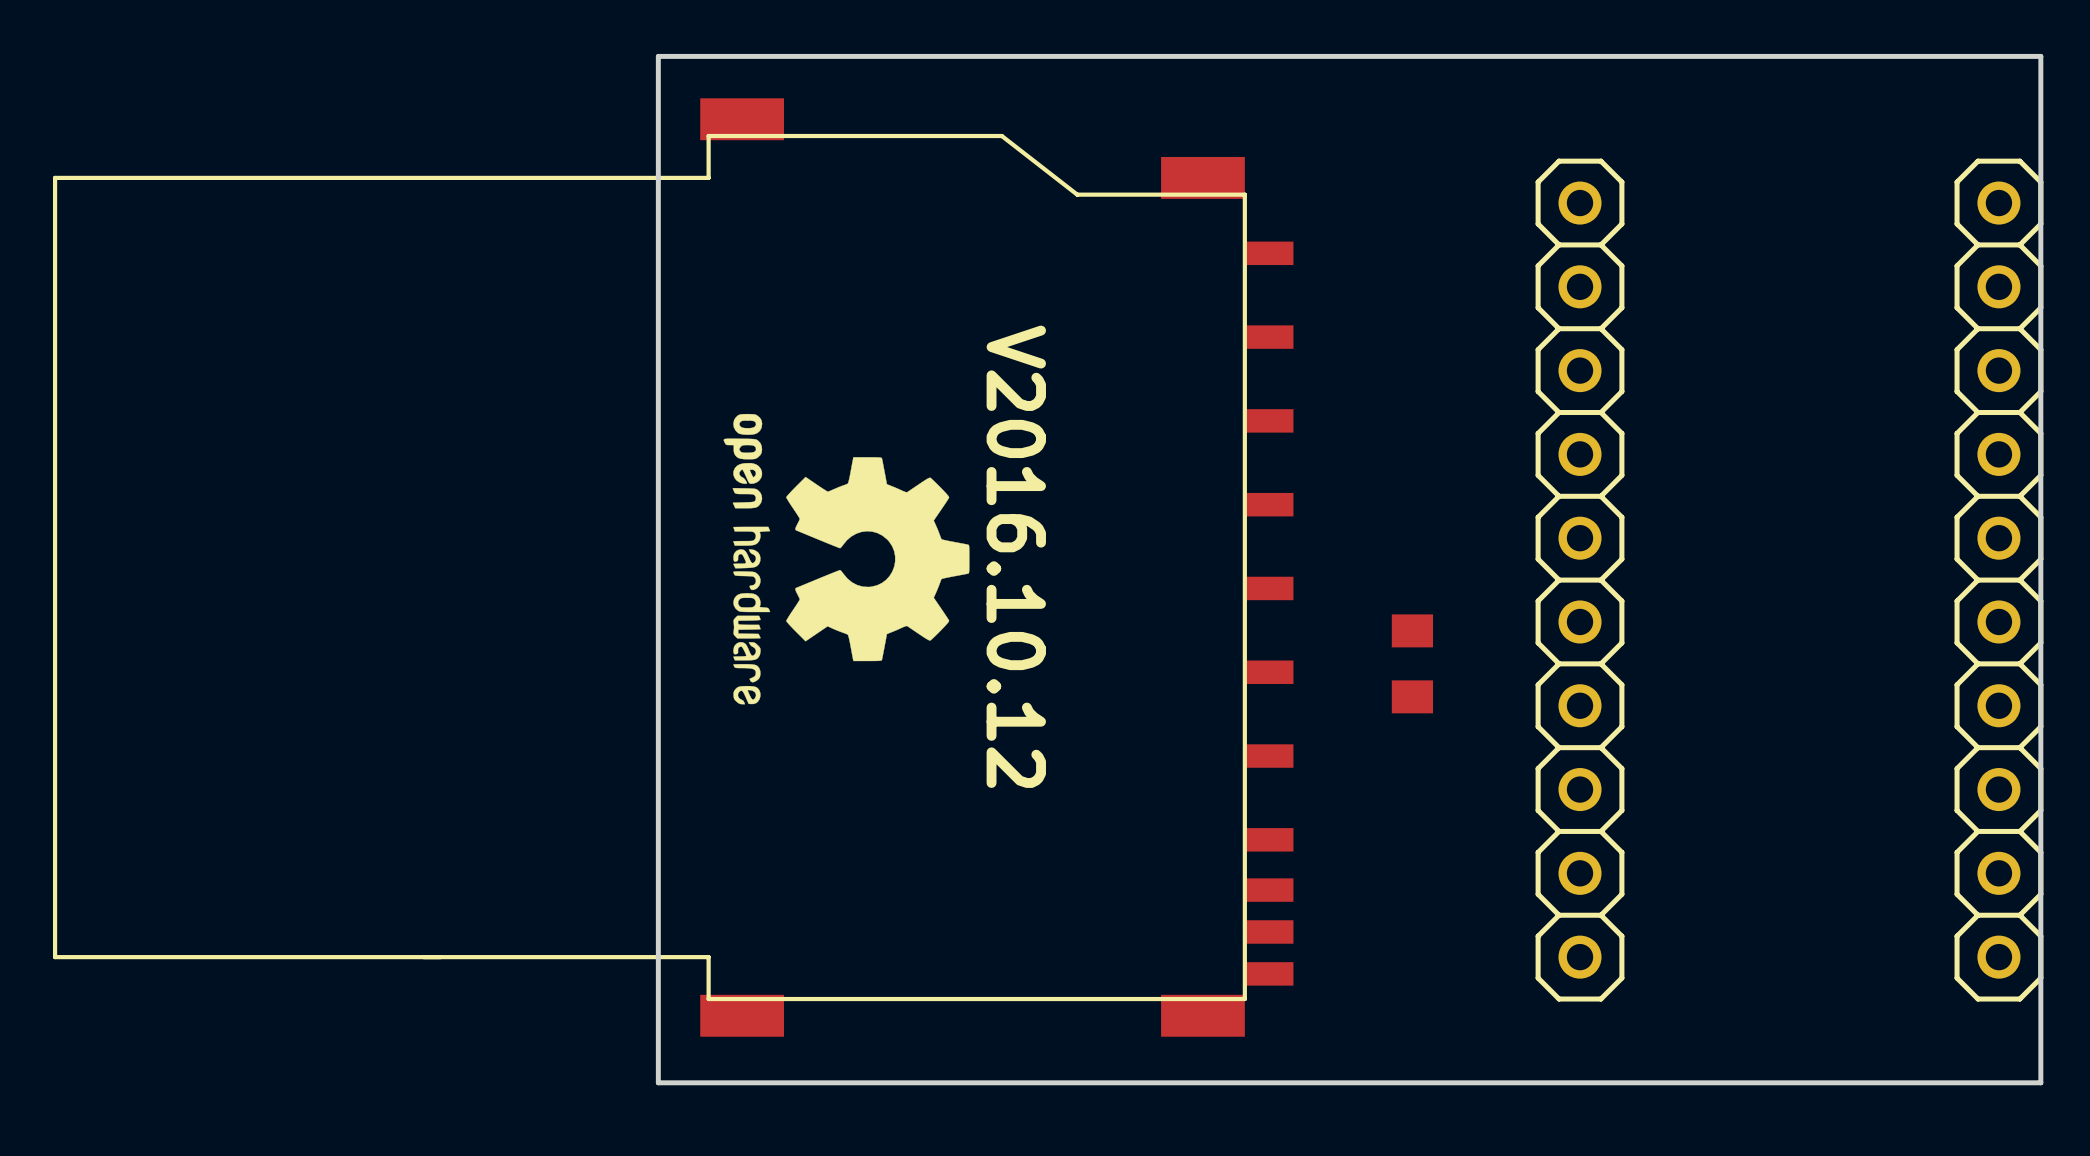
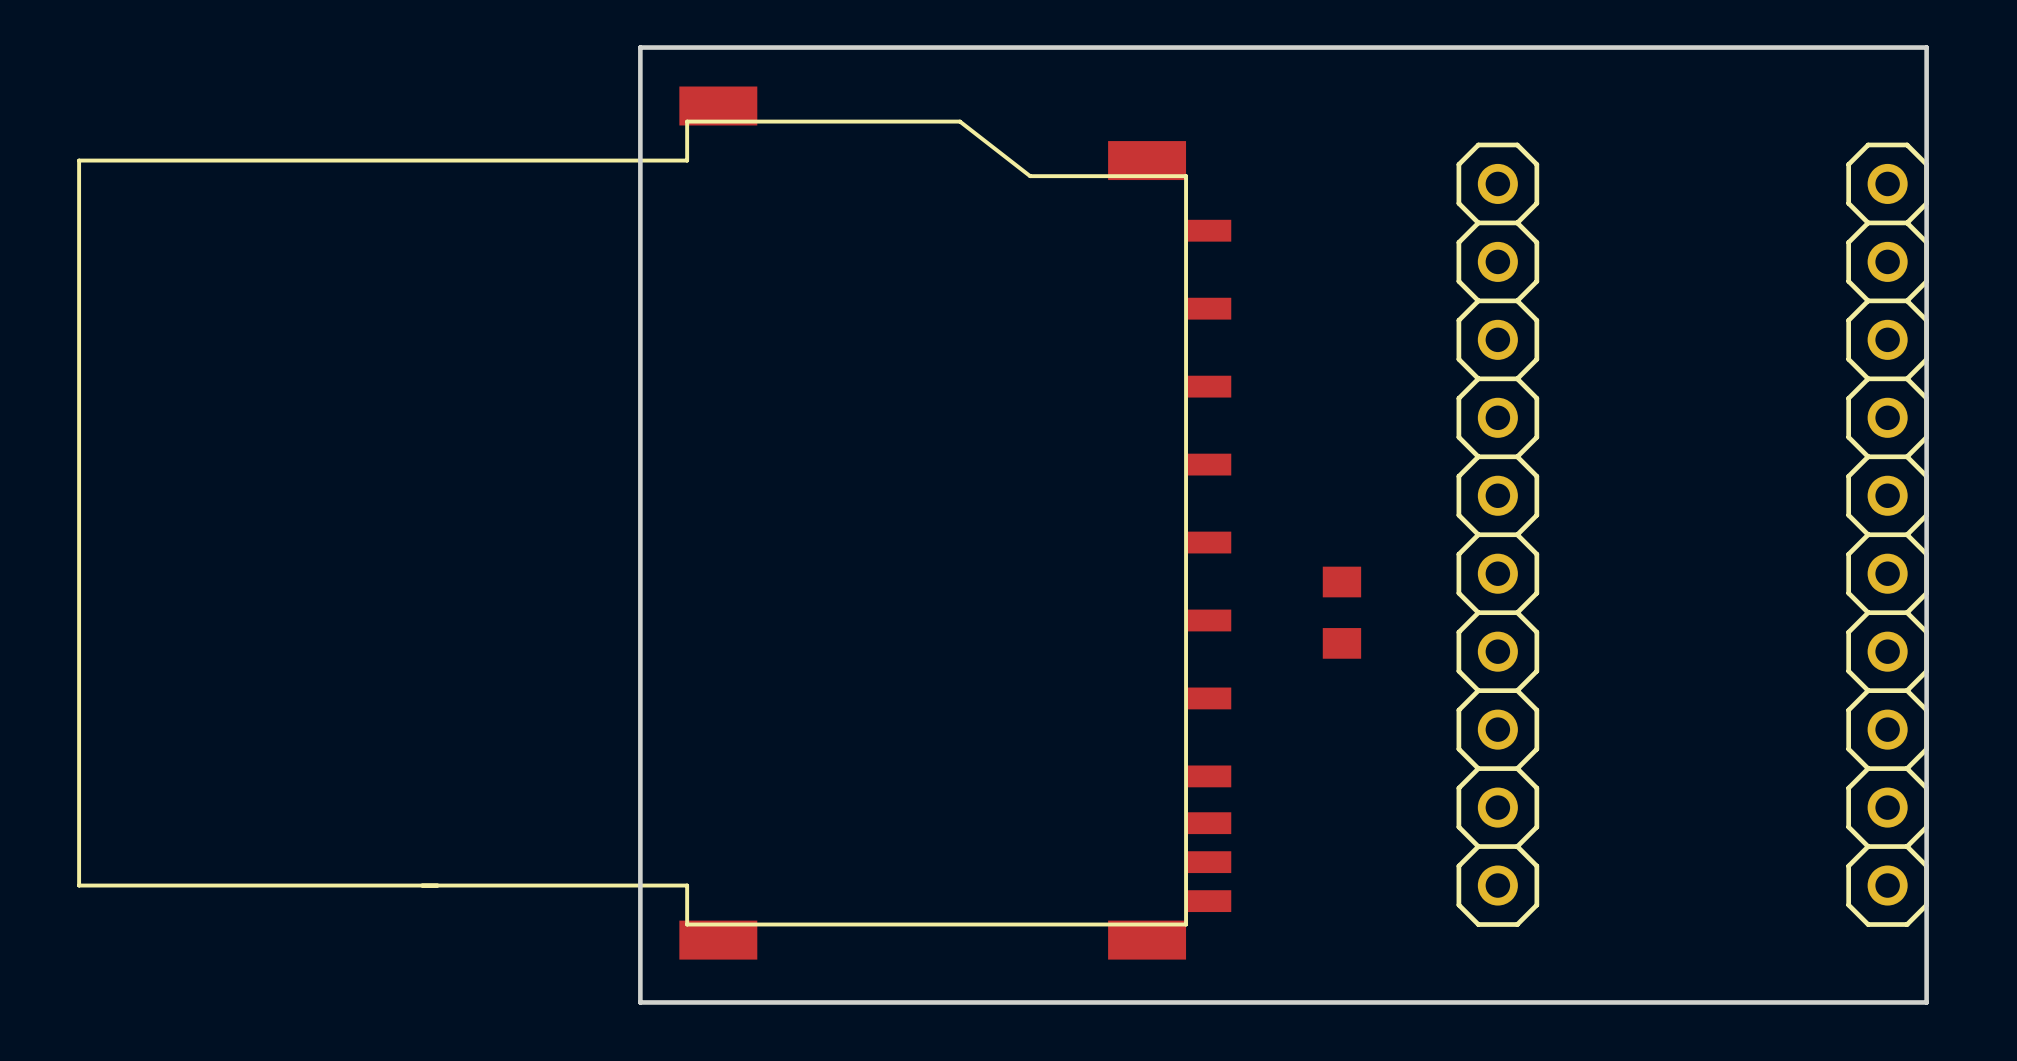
drawing: [723, 413, 970, 705] -> none
text: V2016.10.12 (1016, 556) -> none

